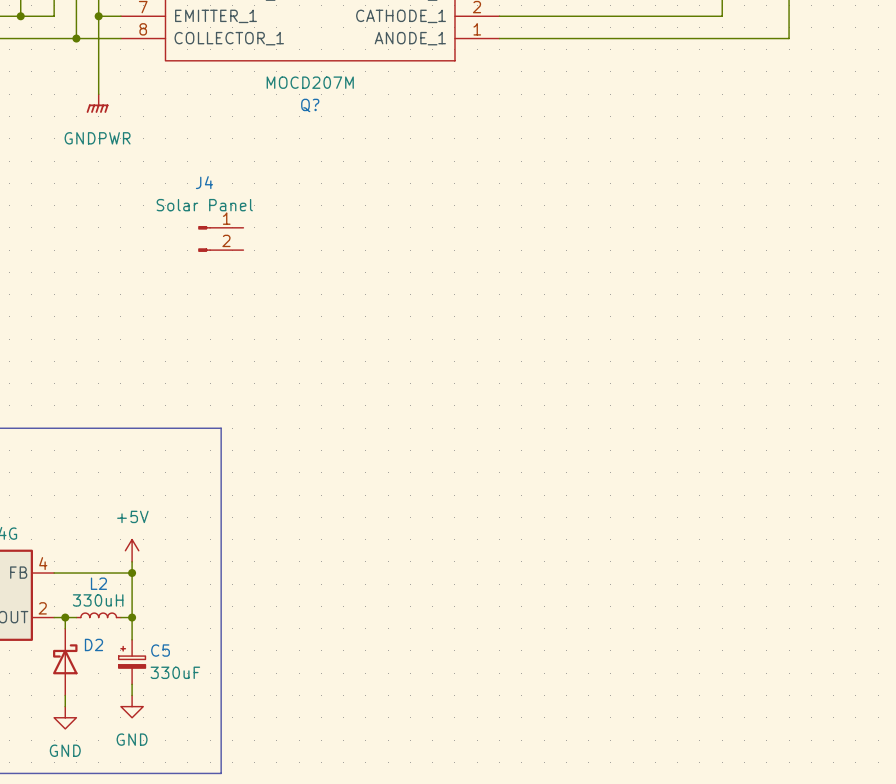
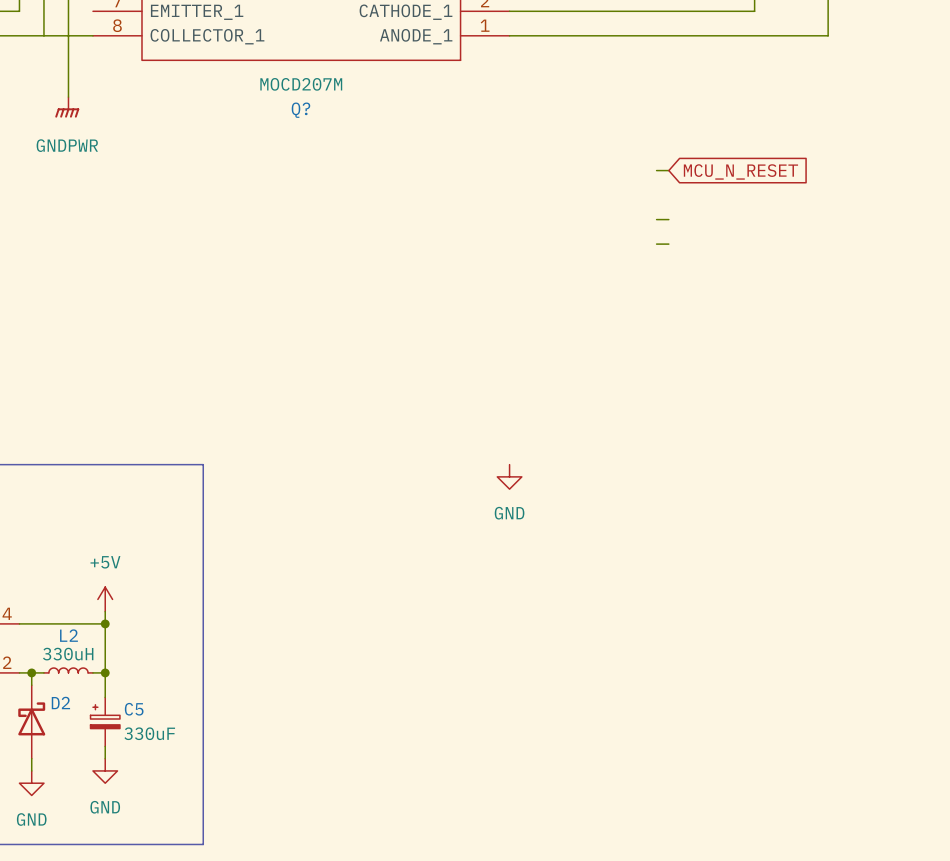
wire: (98, 16) (120, 16) -> none
junction: (98, 16) -> none
junction: (76, 38) -> none
wire: none -> (656, 170) (668, 170)
global label: none -> MCU_N_RESET (740, 171)
wire: none -> (656, 219) (668, 219)
wire: none -> (656, 244) (668, 244)
J4: Solar Panel (220, 238) -> none
power symbol: none -> GND (509, 476)

